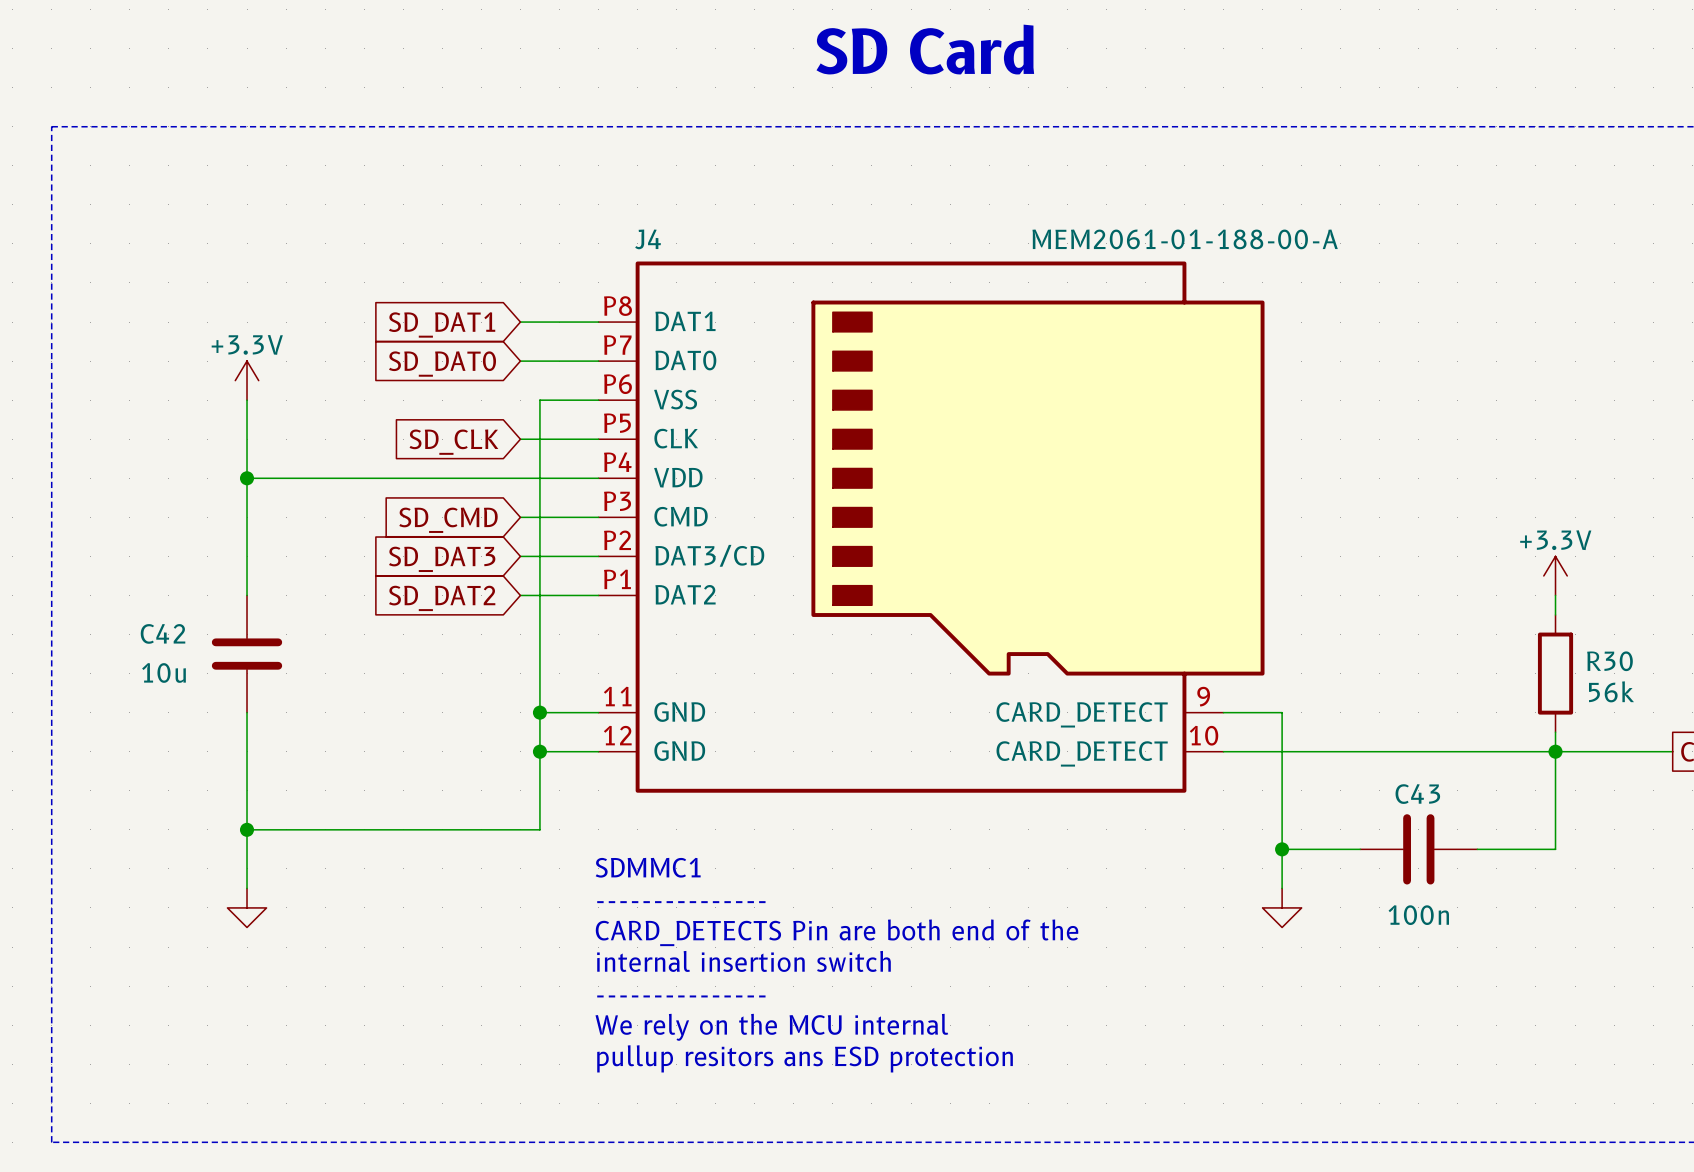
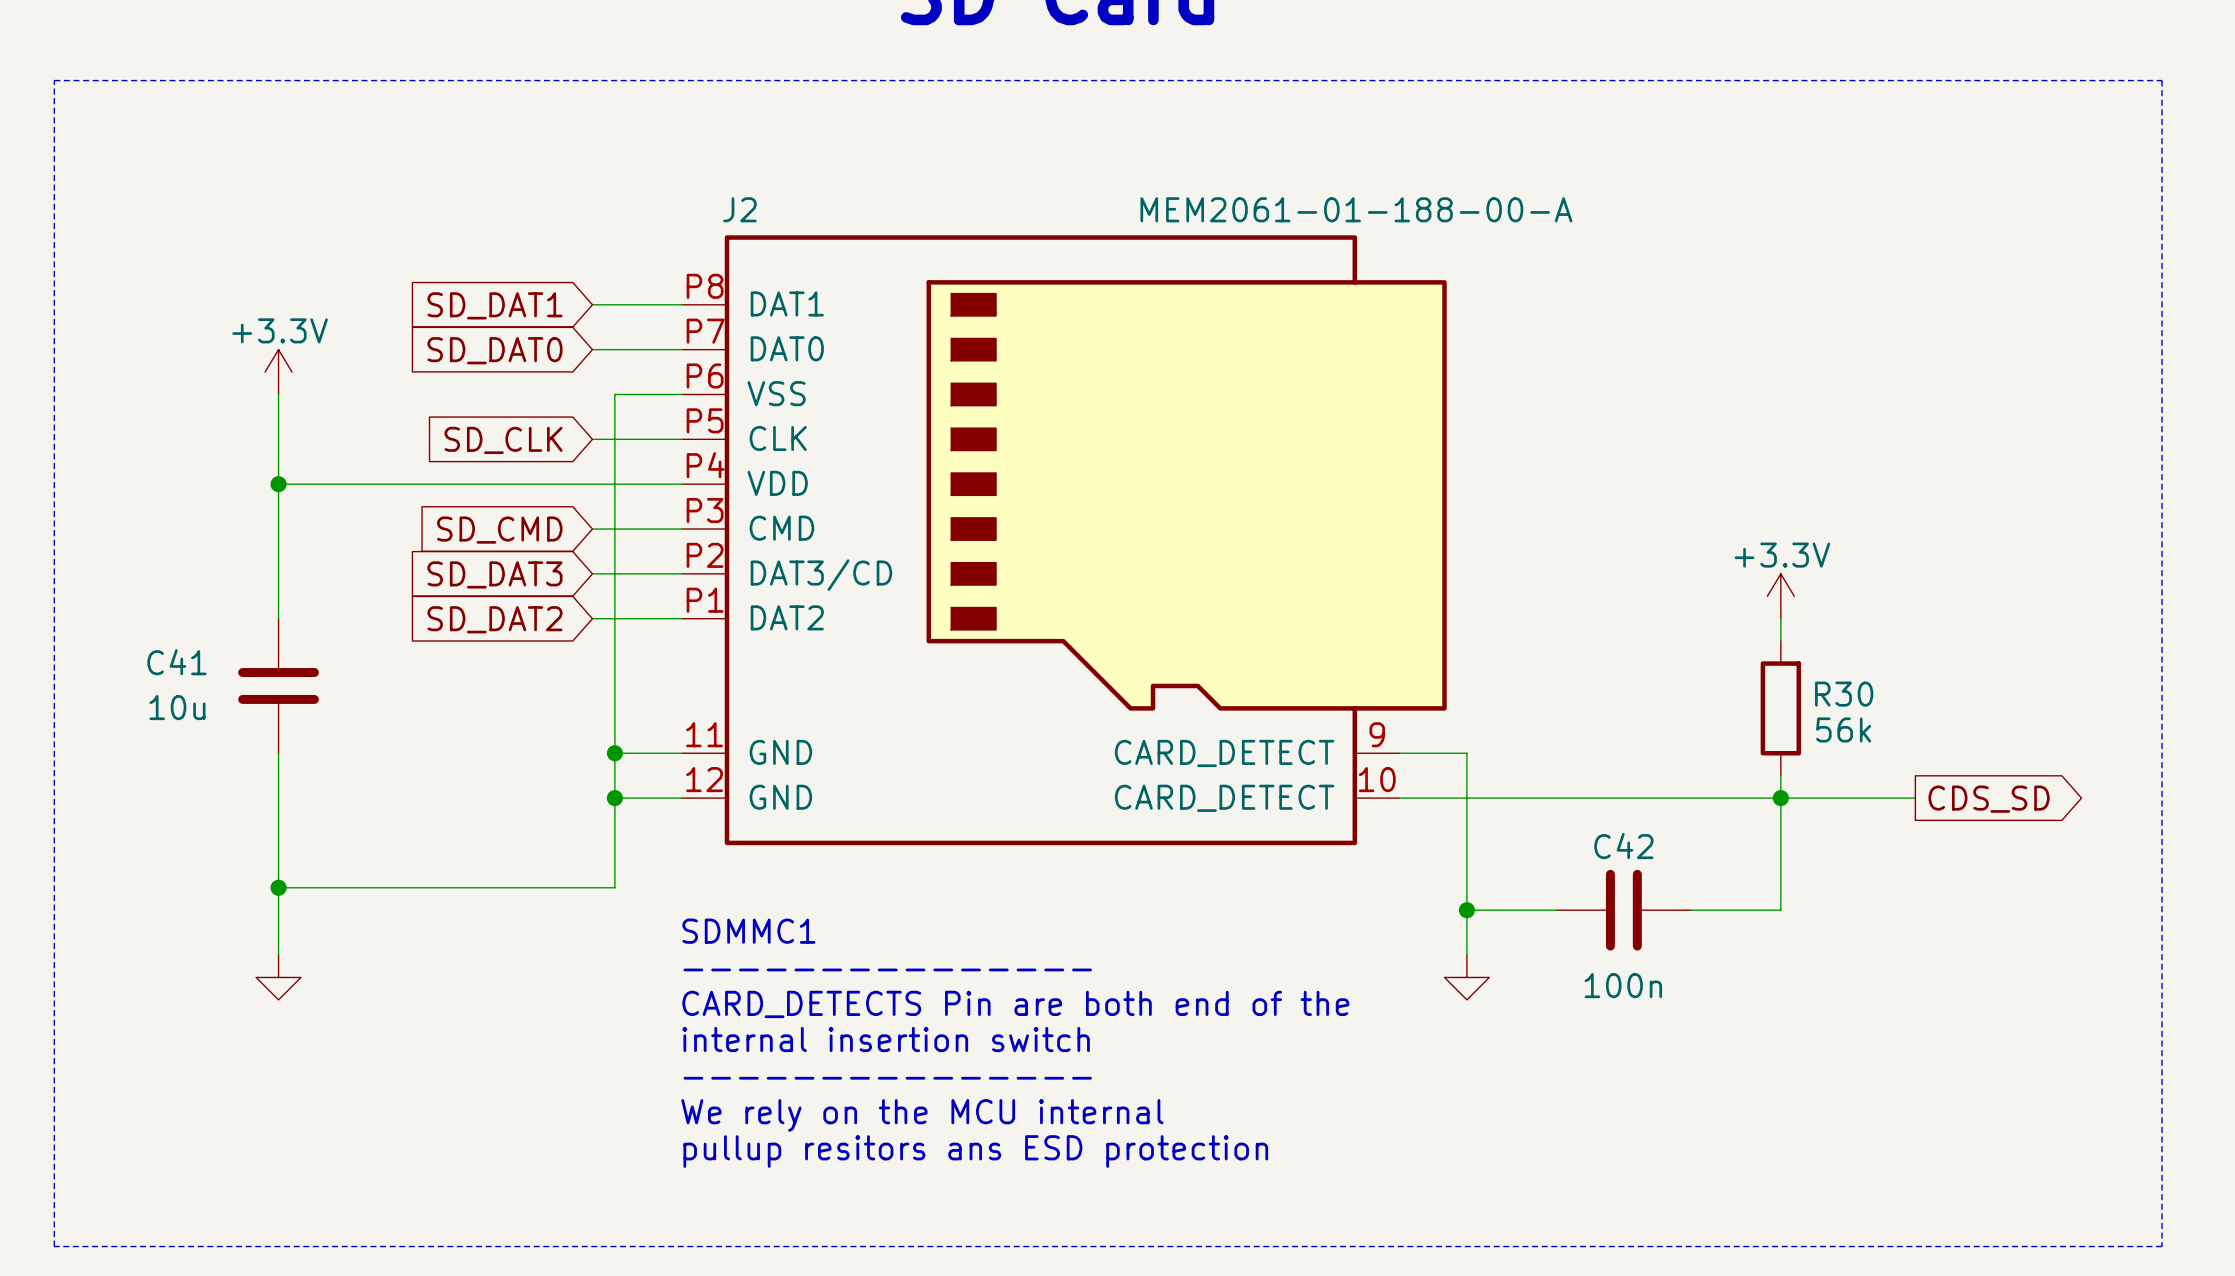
J4 name: J4 (648, 239) -> J2 (739, 209)
C42 name: C42 (163, 633) -> C41 (176, 662)
C43 name: C43 (1417, 794) -> C42 (1623, 846)

